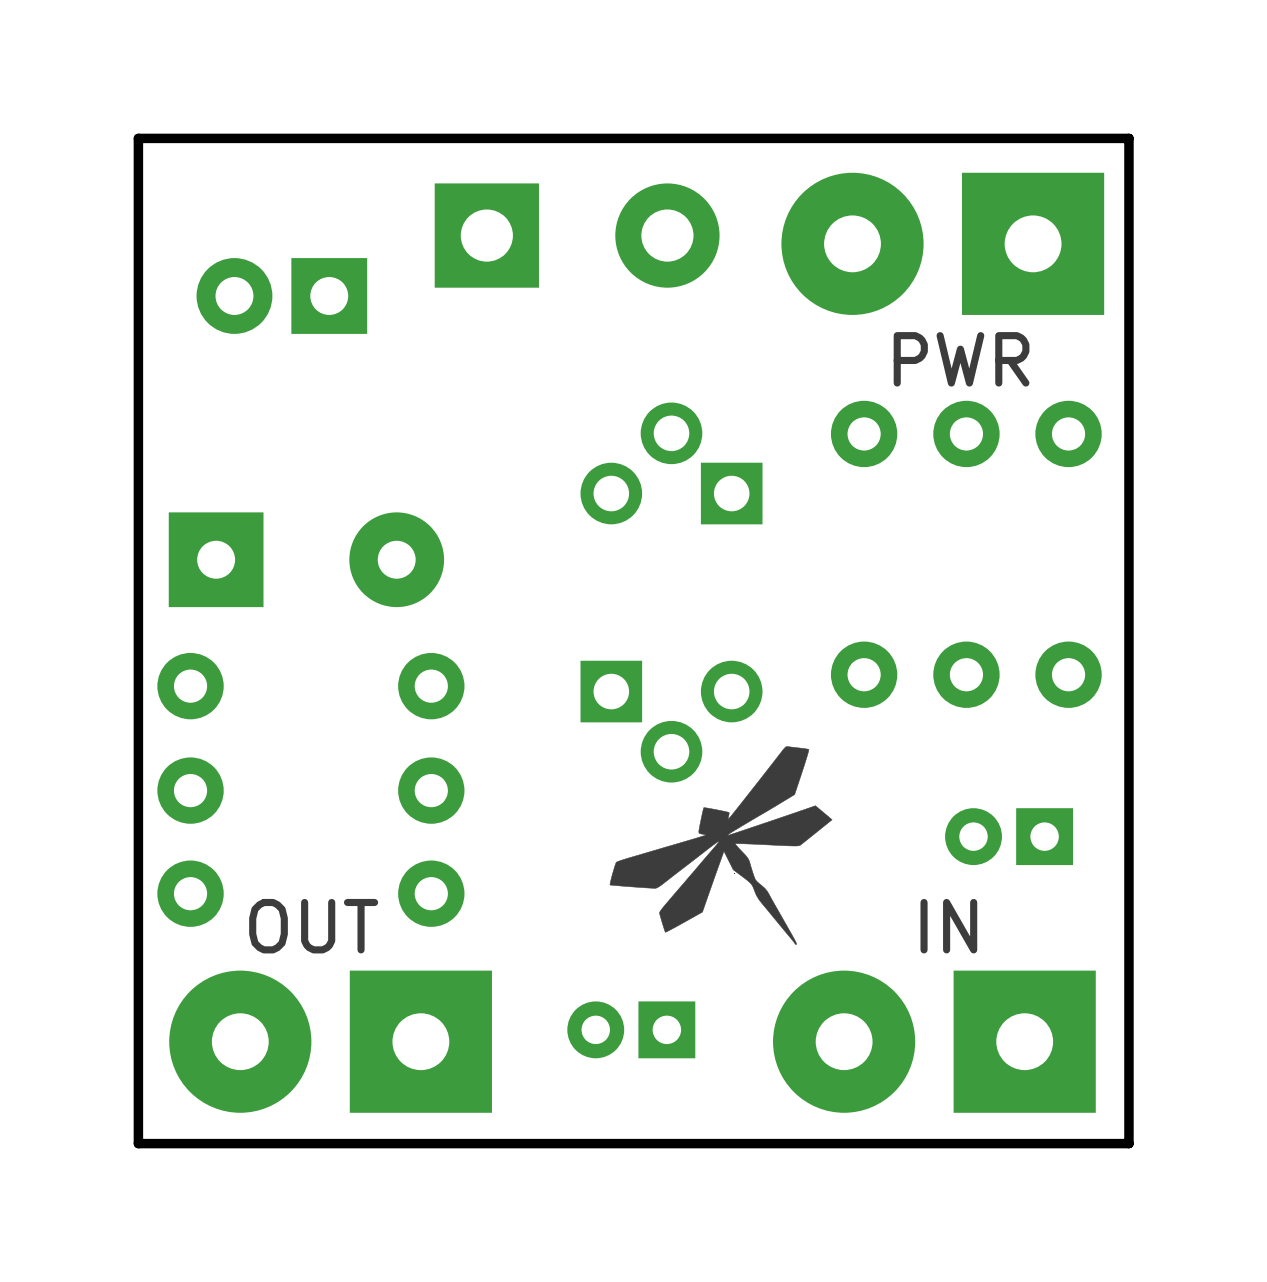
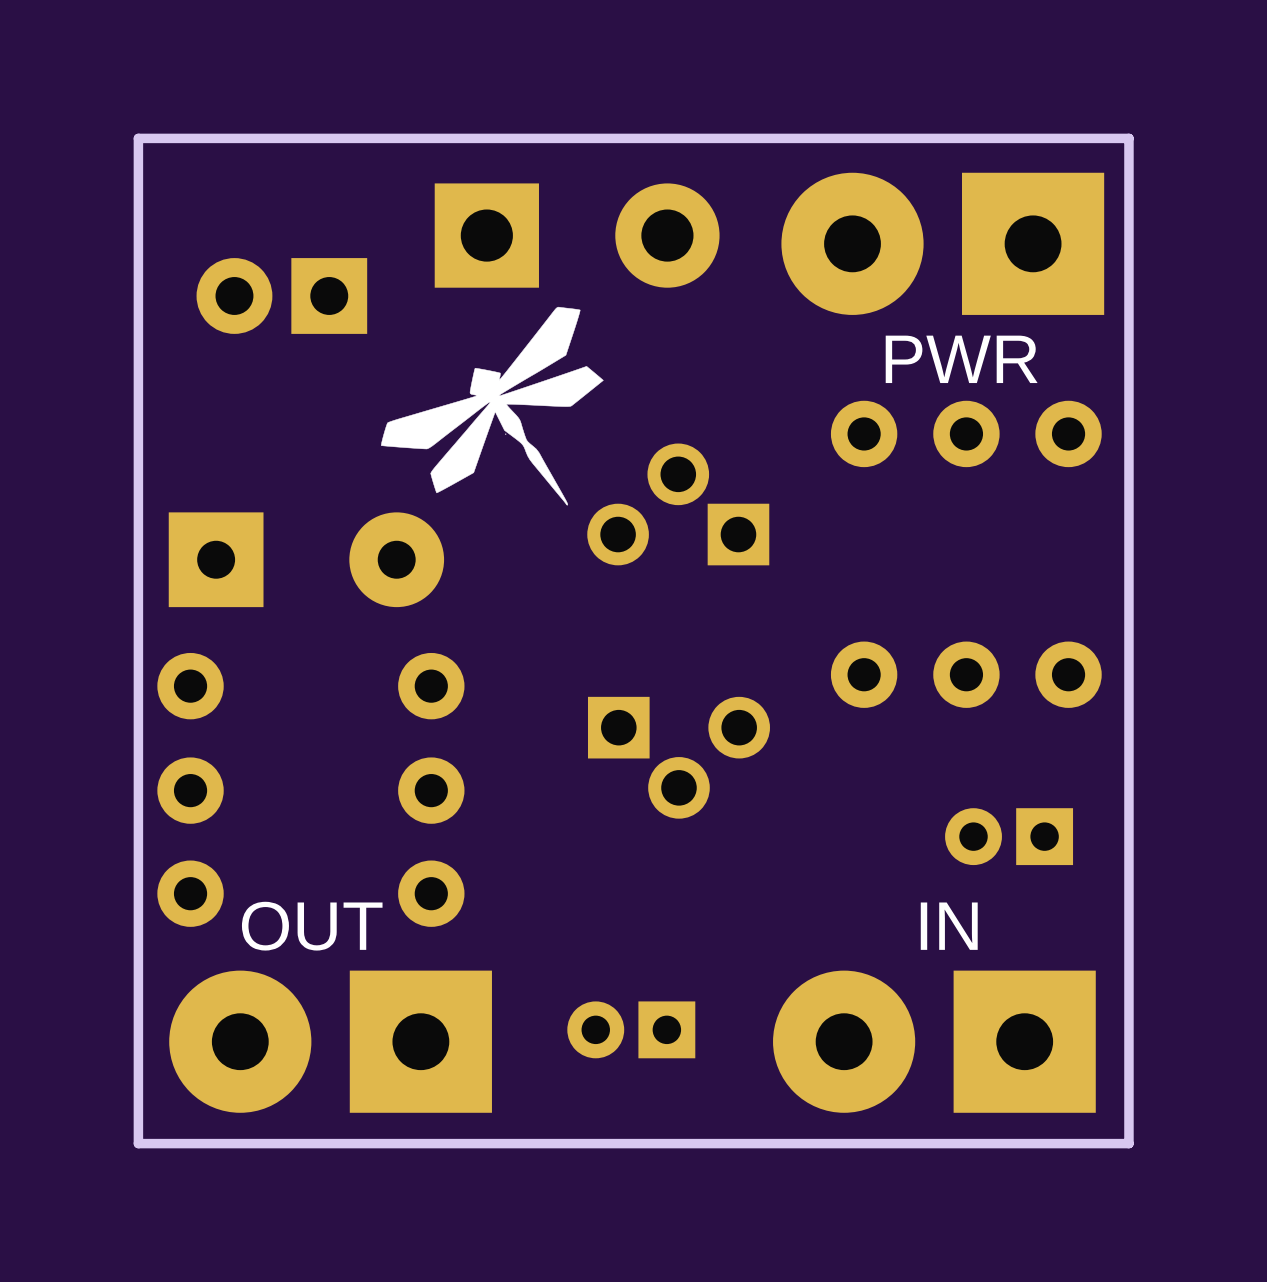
part position: (671, 463) -> (678, 504)
part position: (671, 721) -> (678, 757)
drawing position: (721, 845) -> (492, 406)

